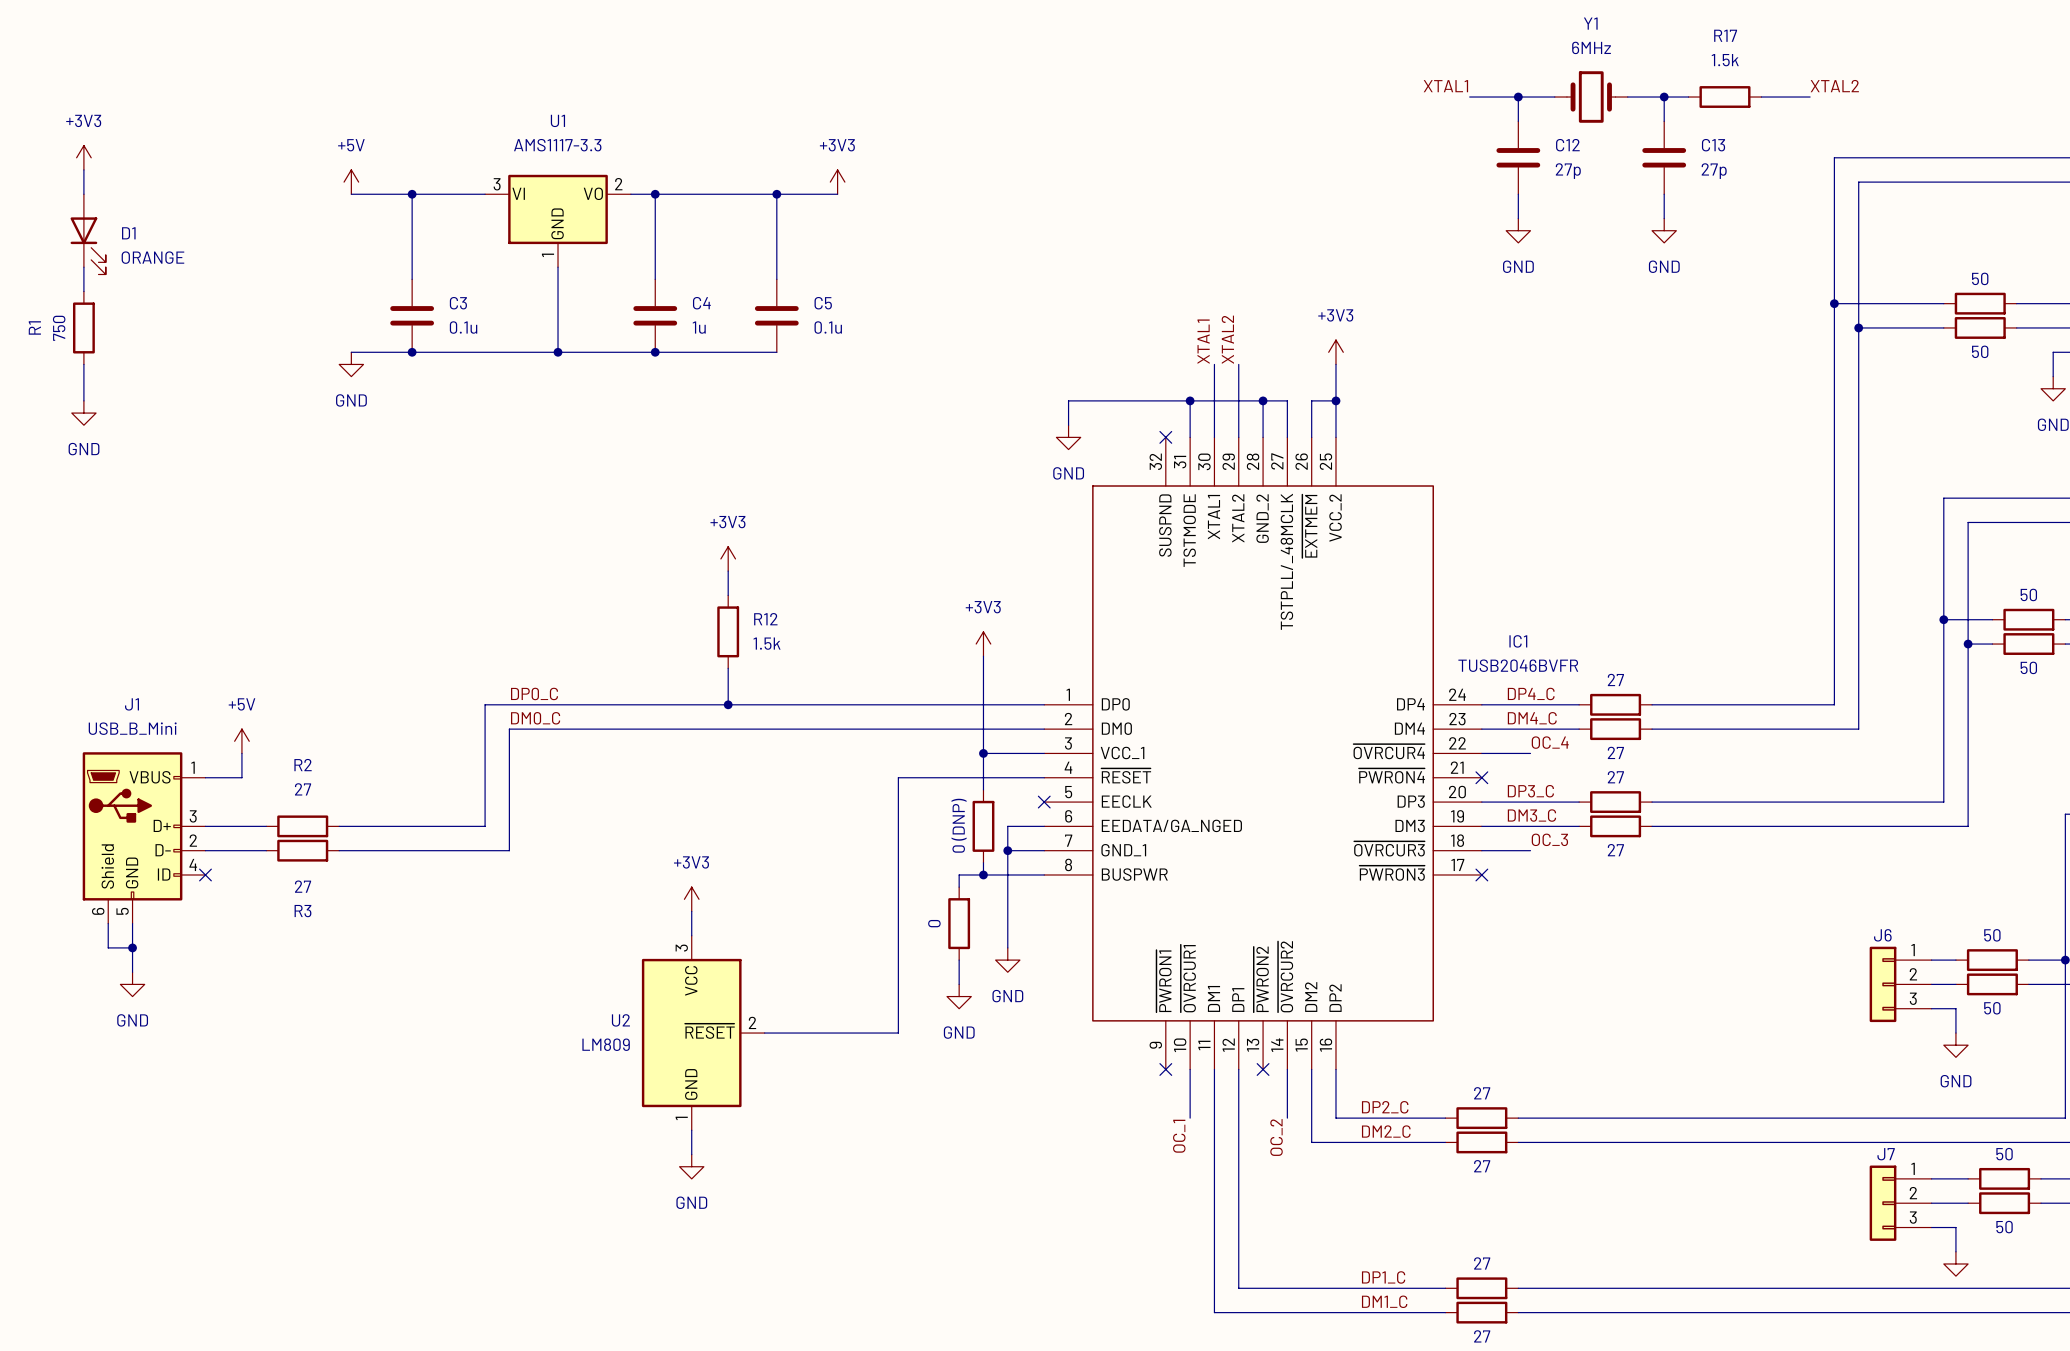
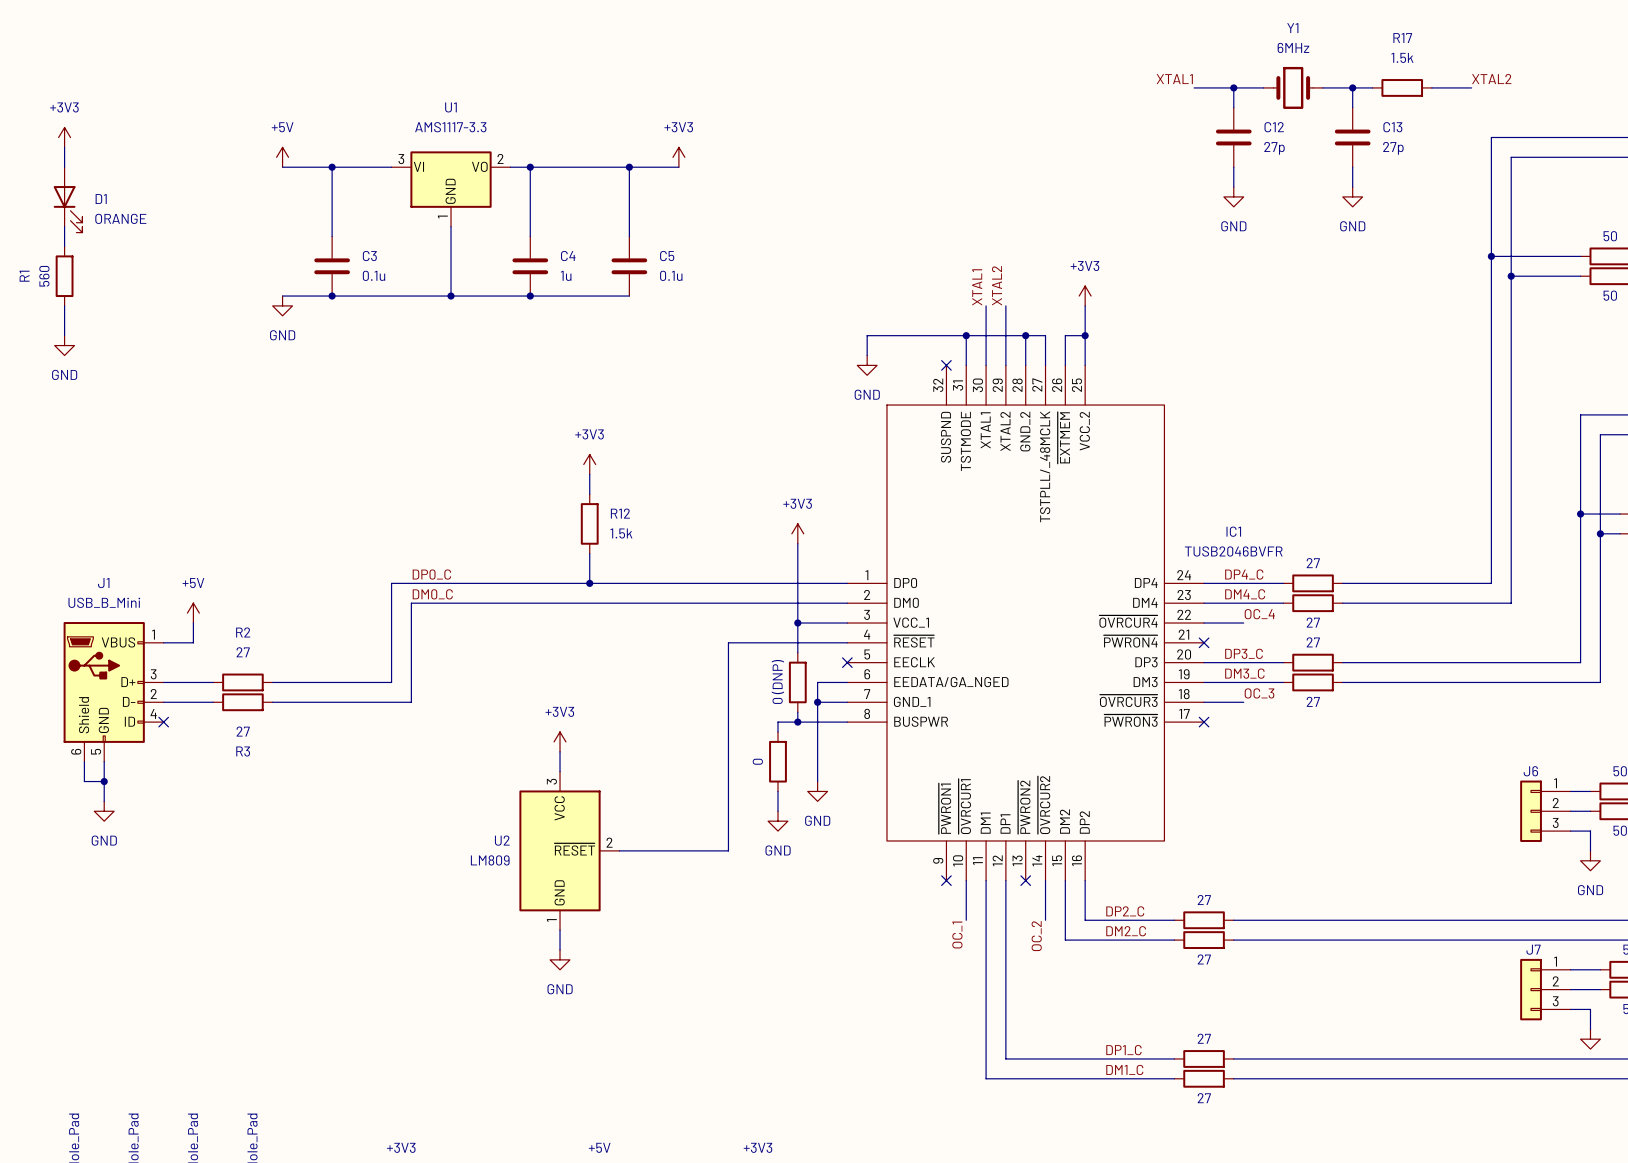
R1 value: 750 (59, 328) -> 560 (44, 276)

